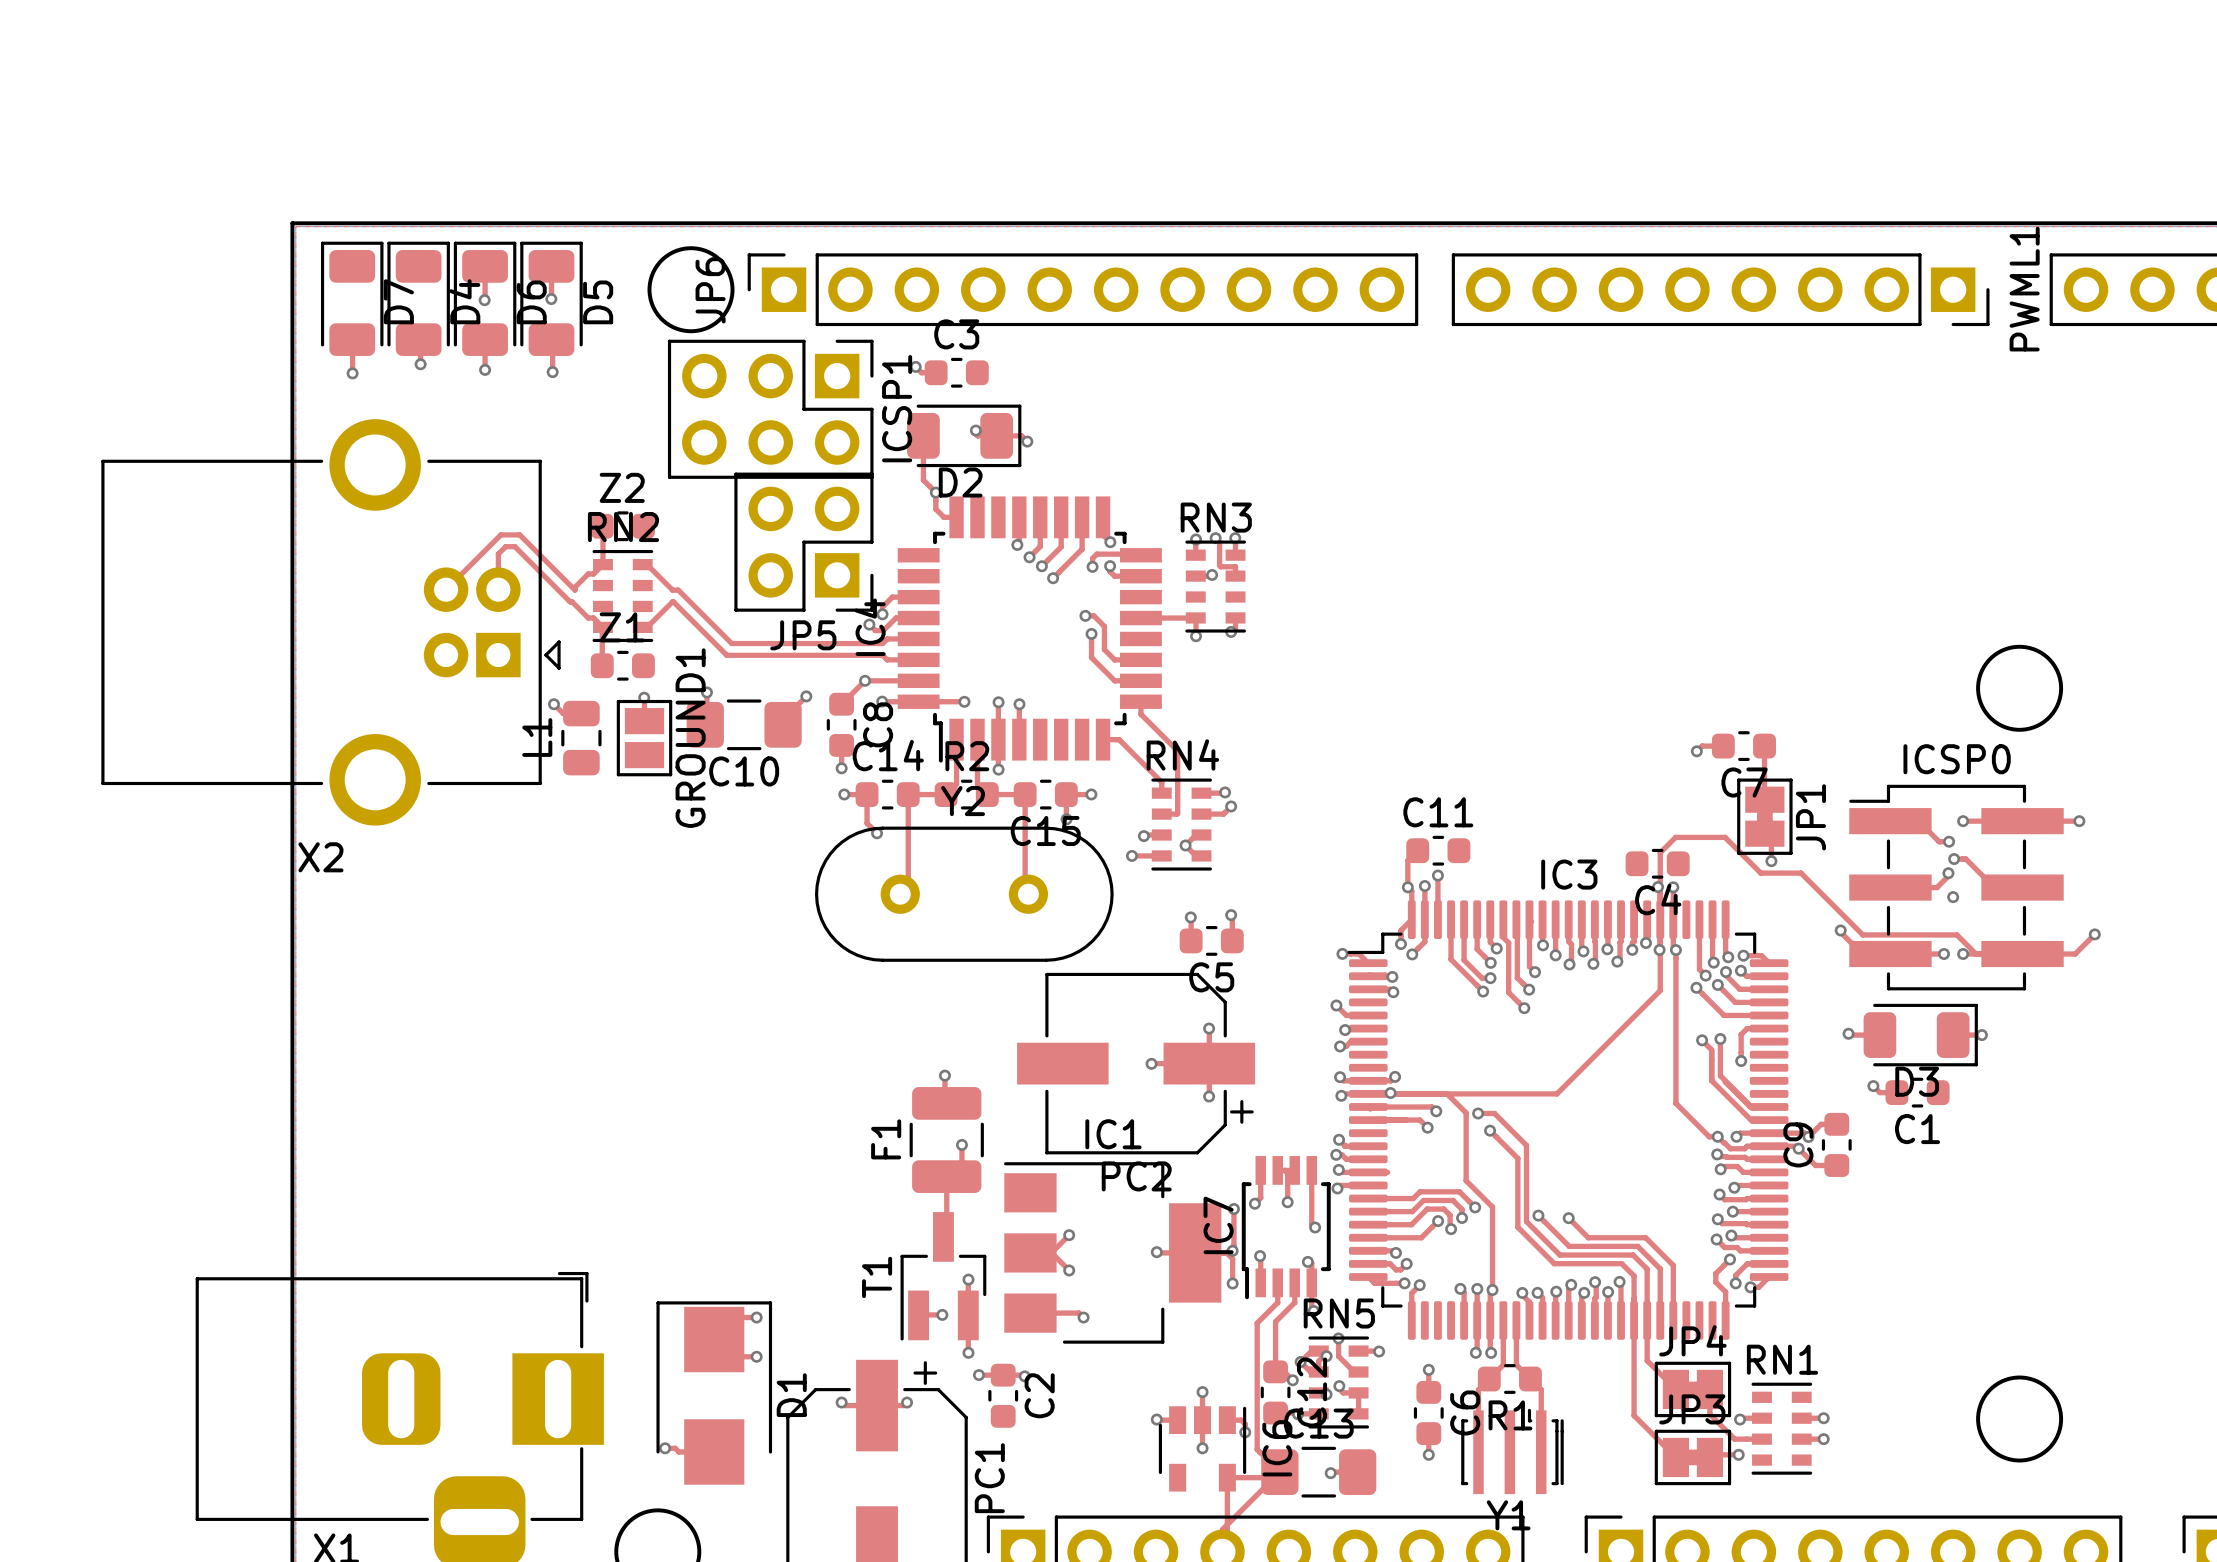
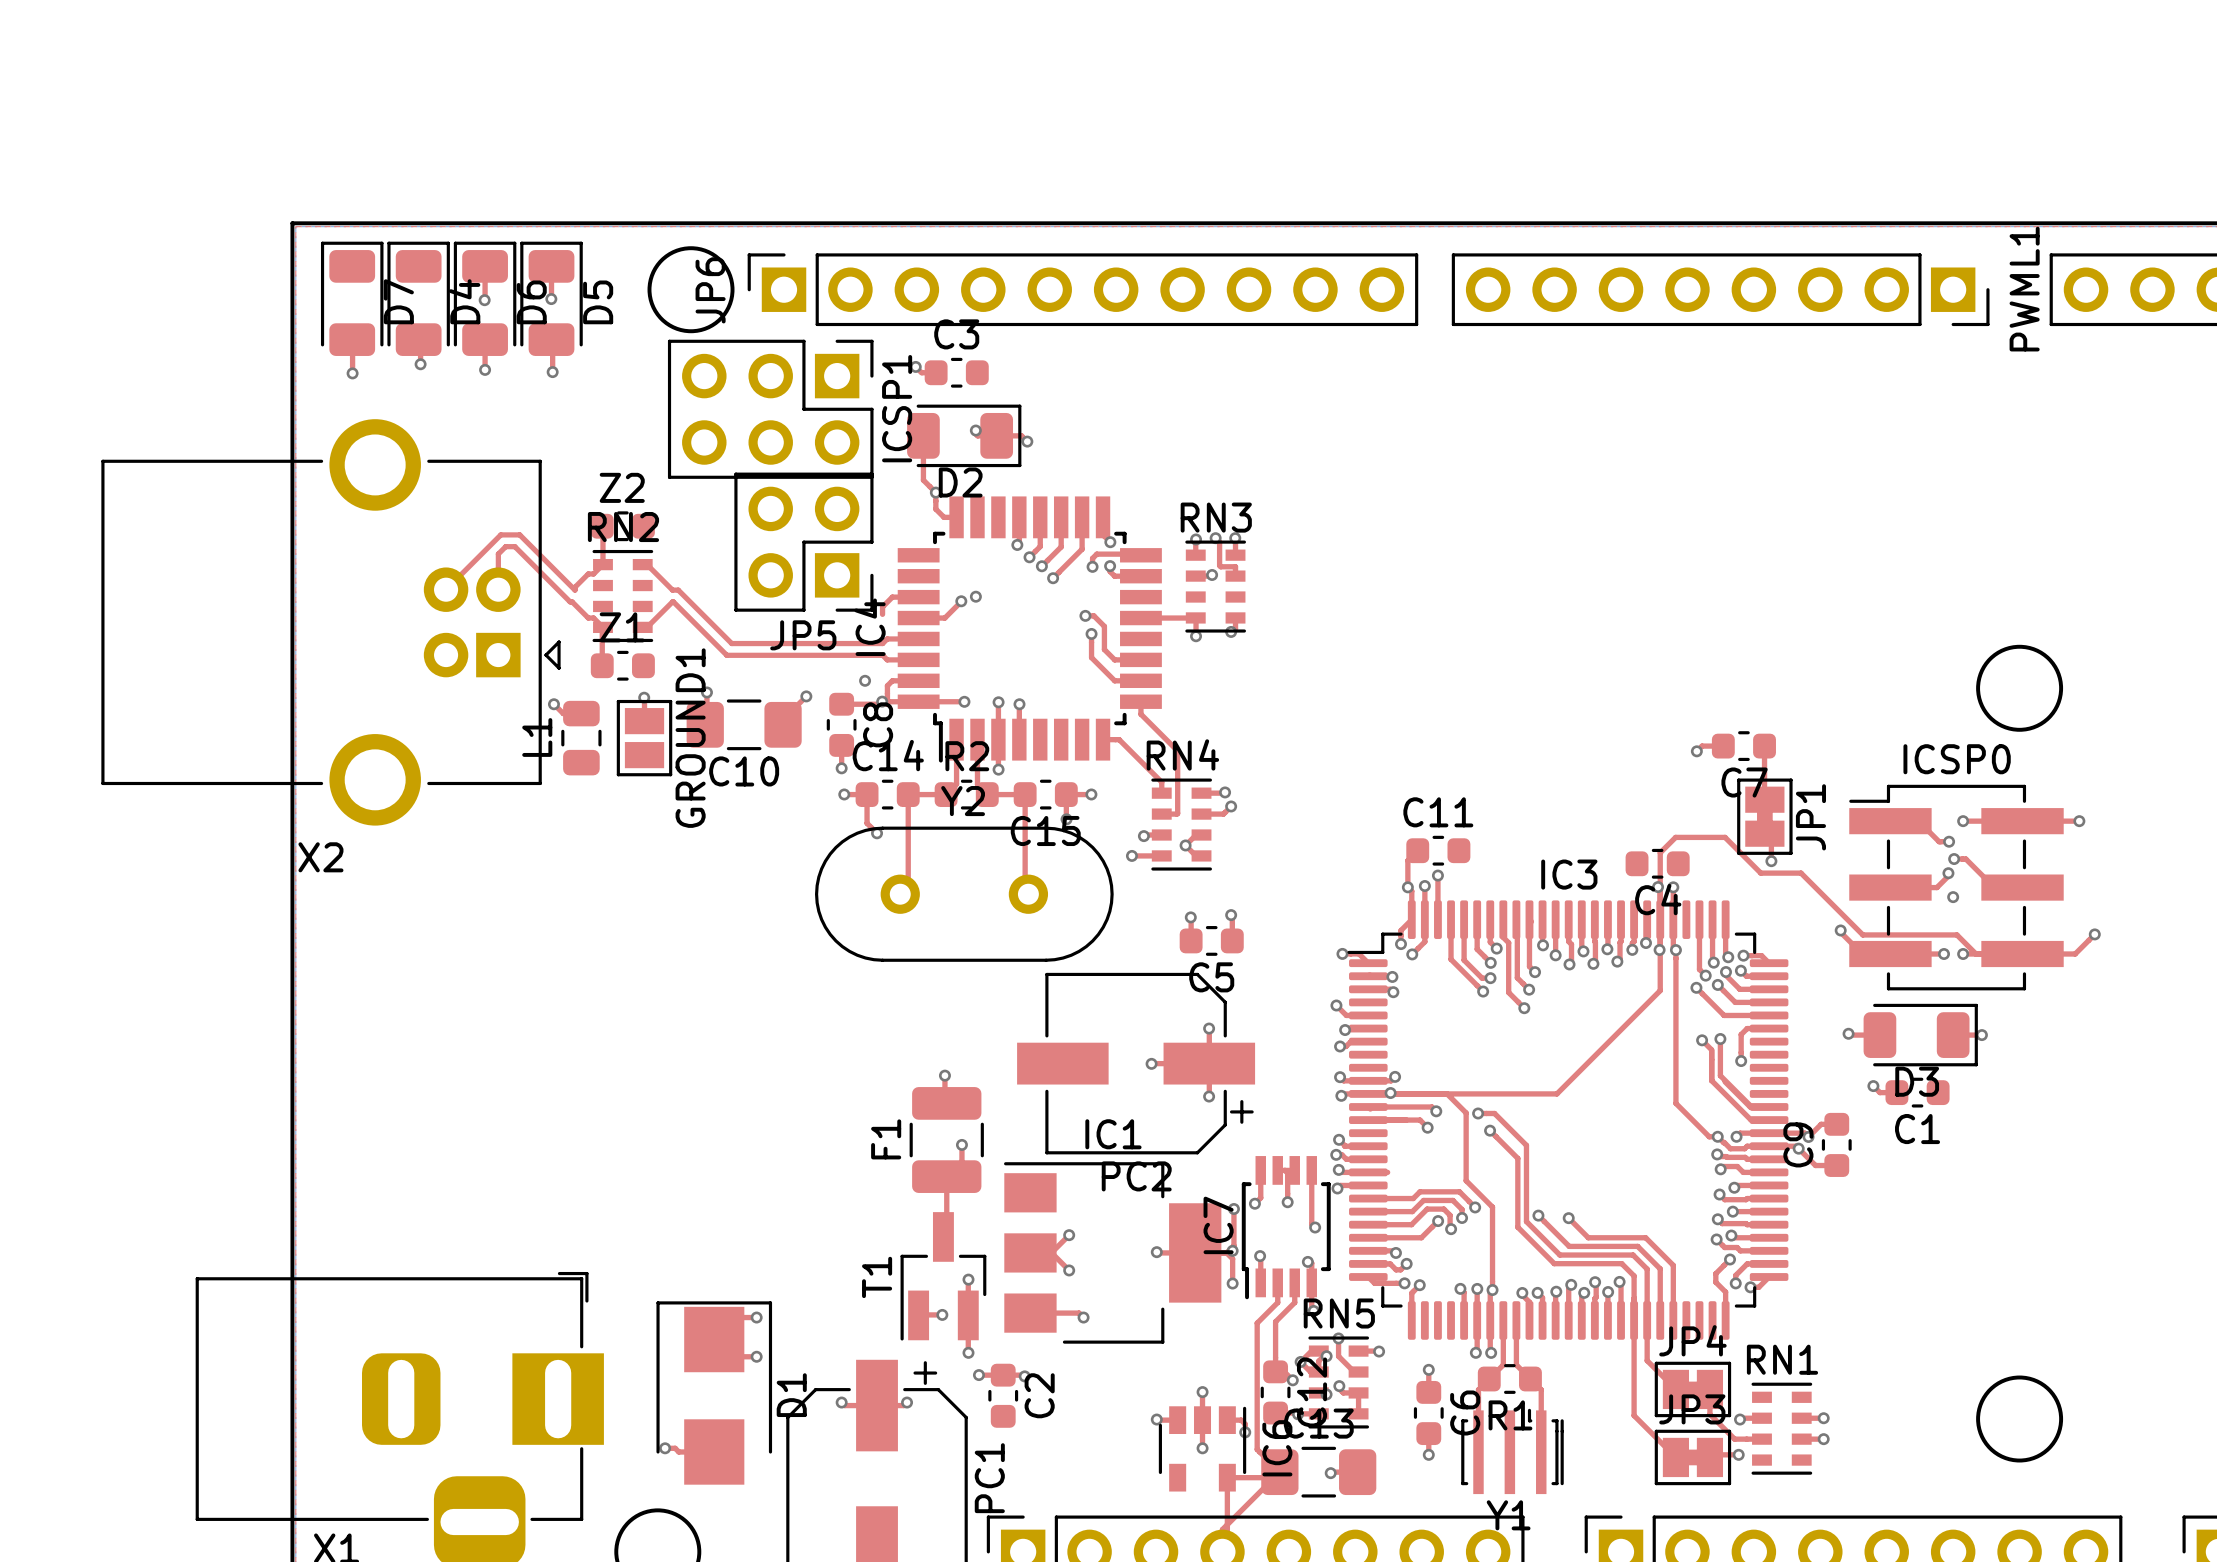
via: none -> (975, 596)
via: none -> (961, 601)
via: (882, 614) -> none
top track: (918, 618) (895, 618) (883, 630) (875, 630) (869, 624) -> (918, 618) (944, 618) (961, 601)
via: (869, 624) -> none
top track: (892, 680) (865, 680) (841, 704) -> (892, 680) (887, 685) (887, 702) (885, 704) (841, 704)

